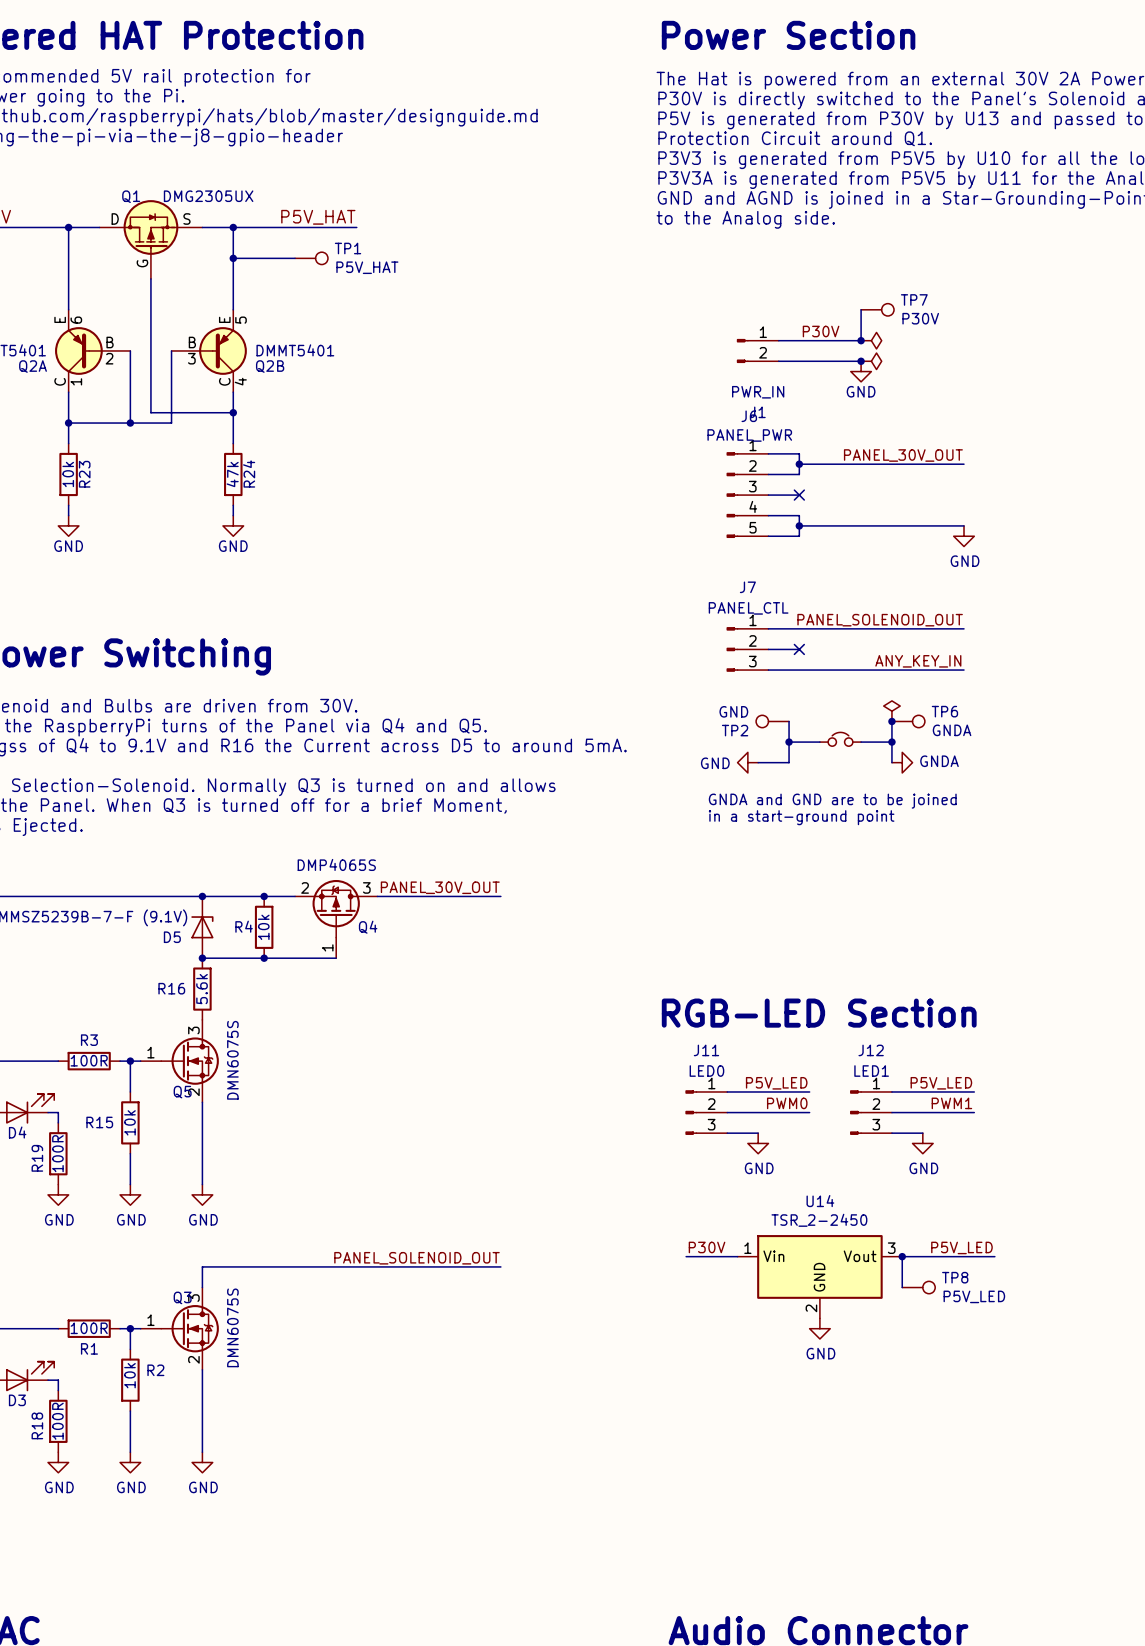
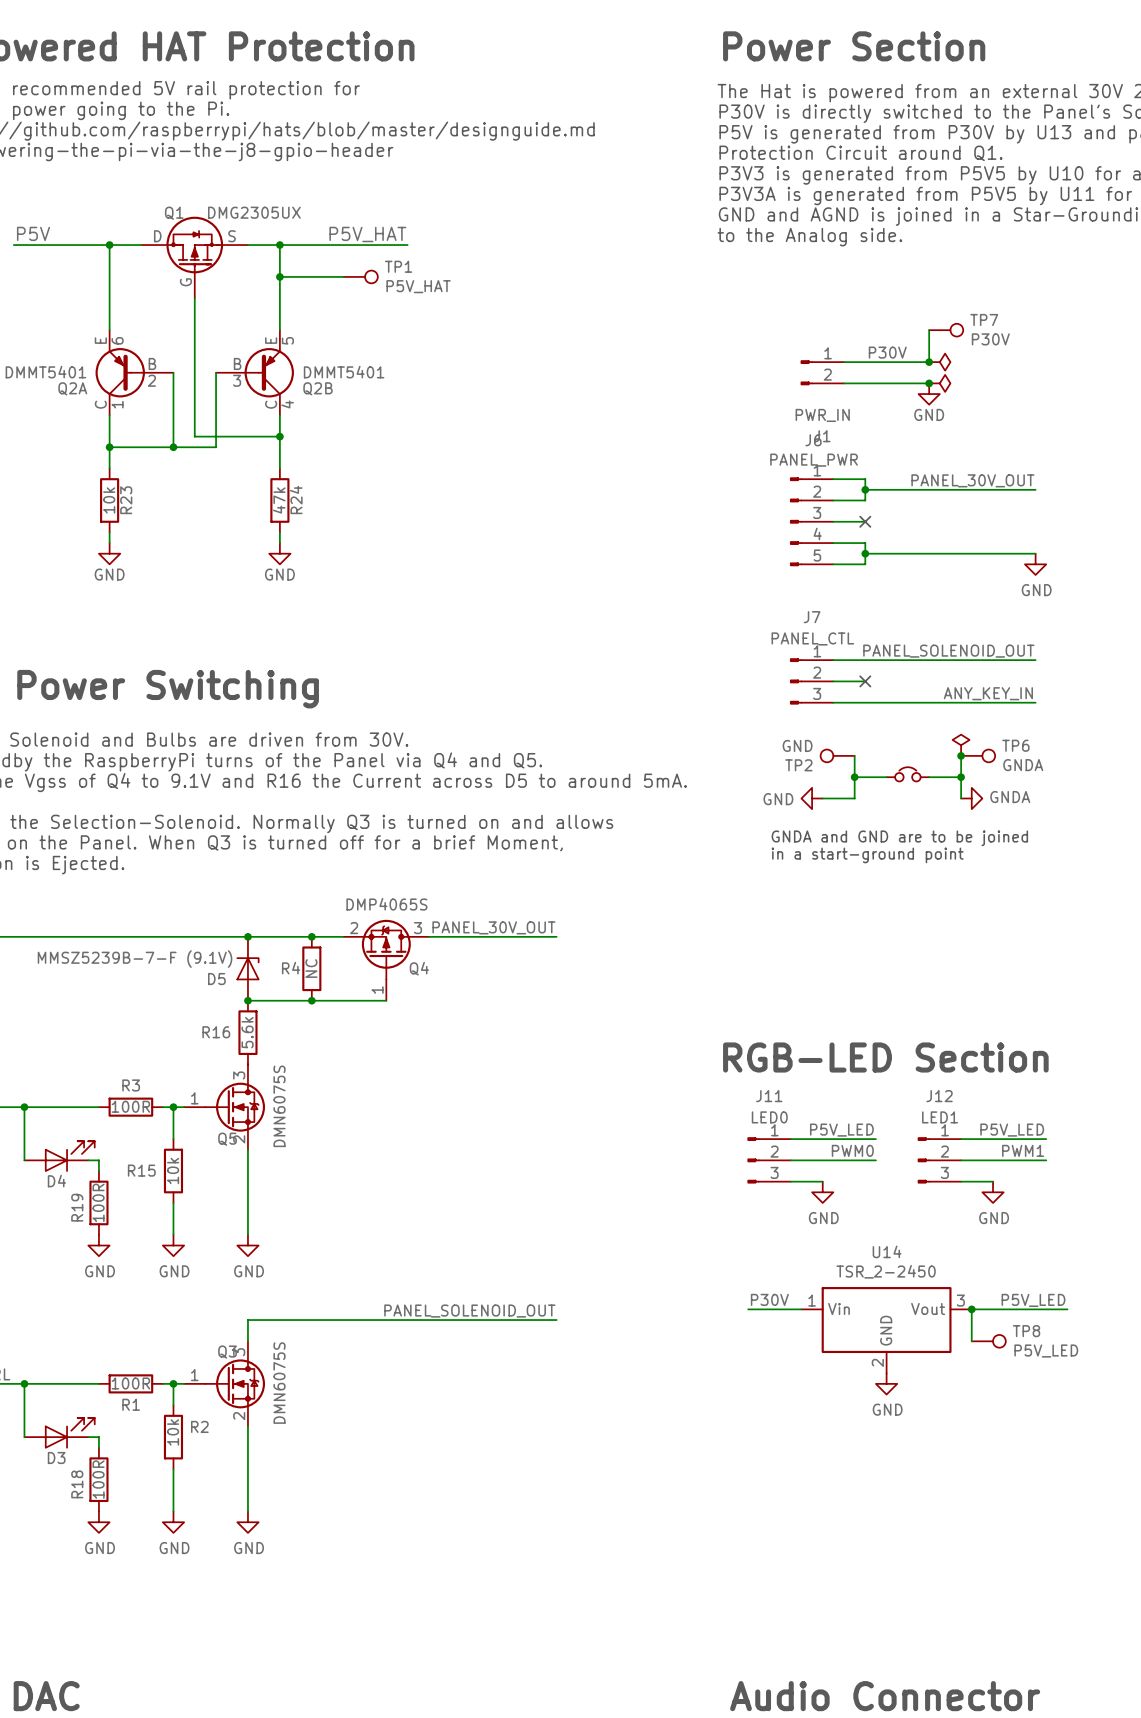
R4 value: 10k (263, 927) -> NC (311, 968)

